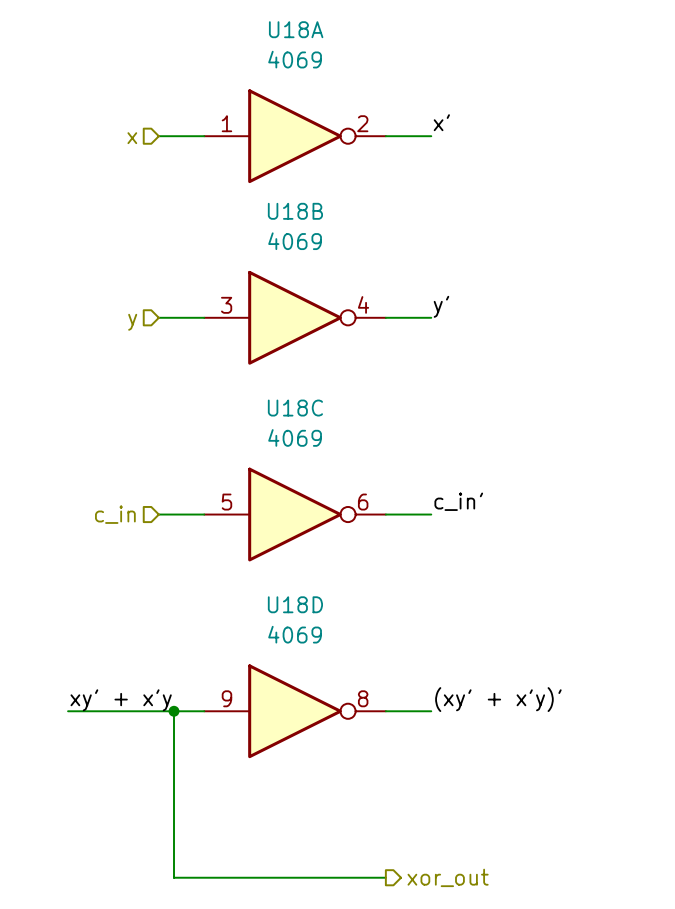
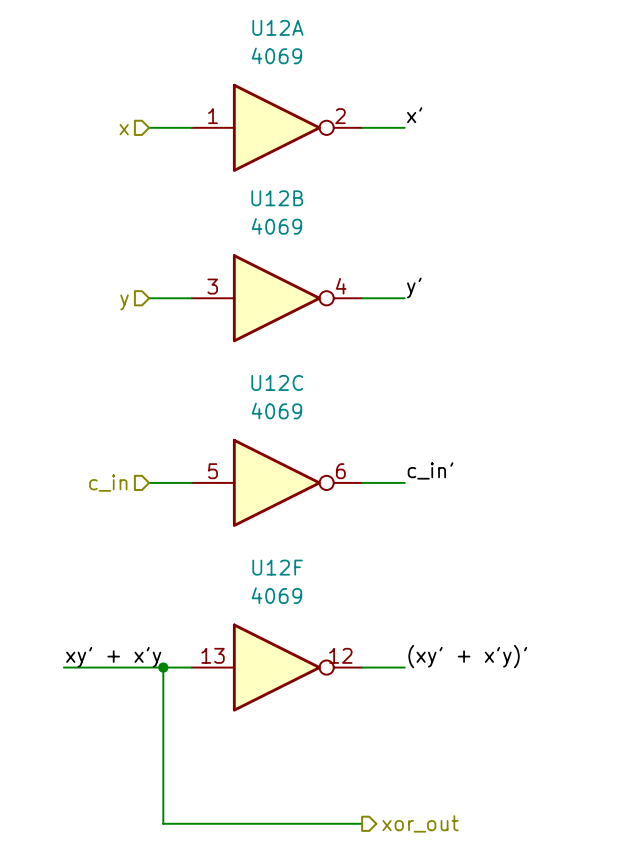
U18A name: U18A (296, 29) -> U12A (277, 27)
U18B name: U18B (295, 211) -> U12B (277, 198)
U18C name: U18C (295, 408) -> U12C (277, 382)
U18D name: U18D (295, 604) -> U12F (277, 567)
U18D pin number: 9 (226, 698) -> 13 (213, 655)
U18D pin number: 8 (363, 698) -> 12 (340, 655)

